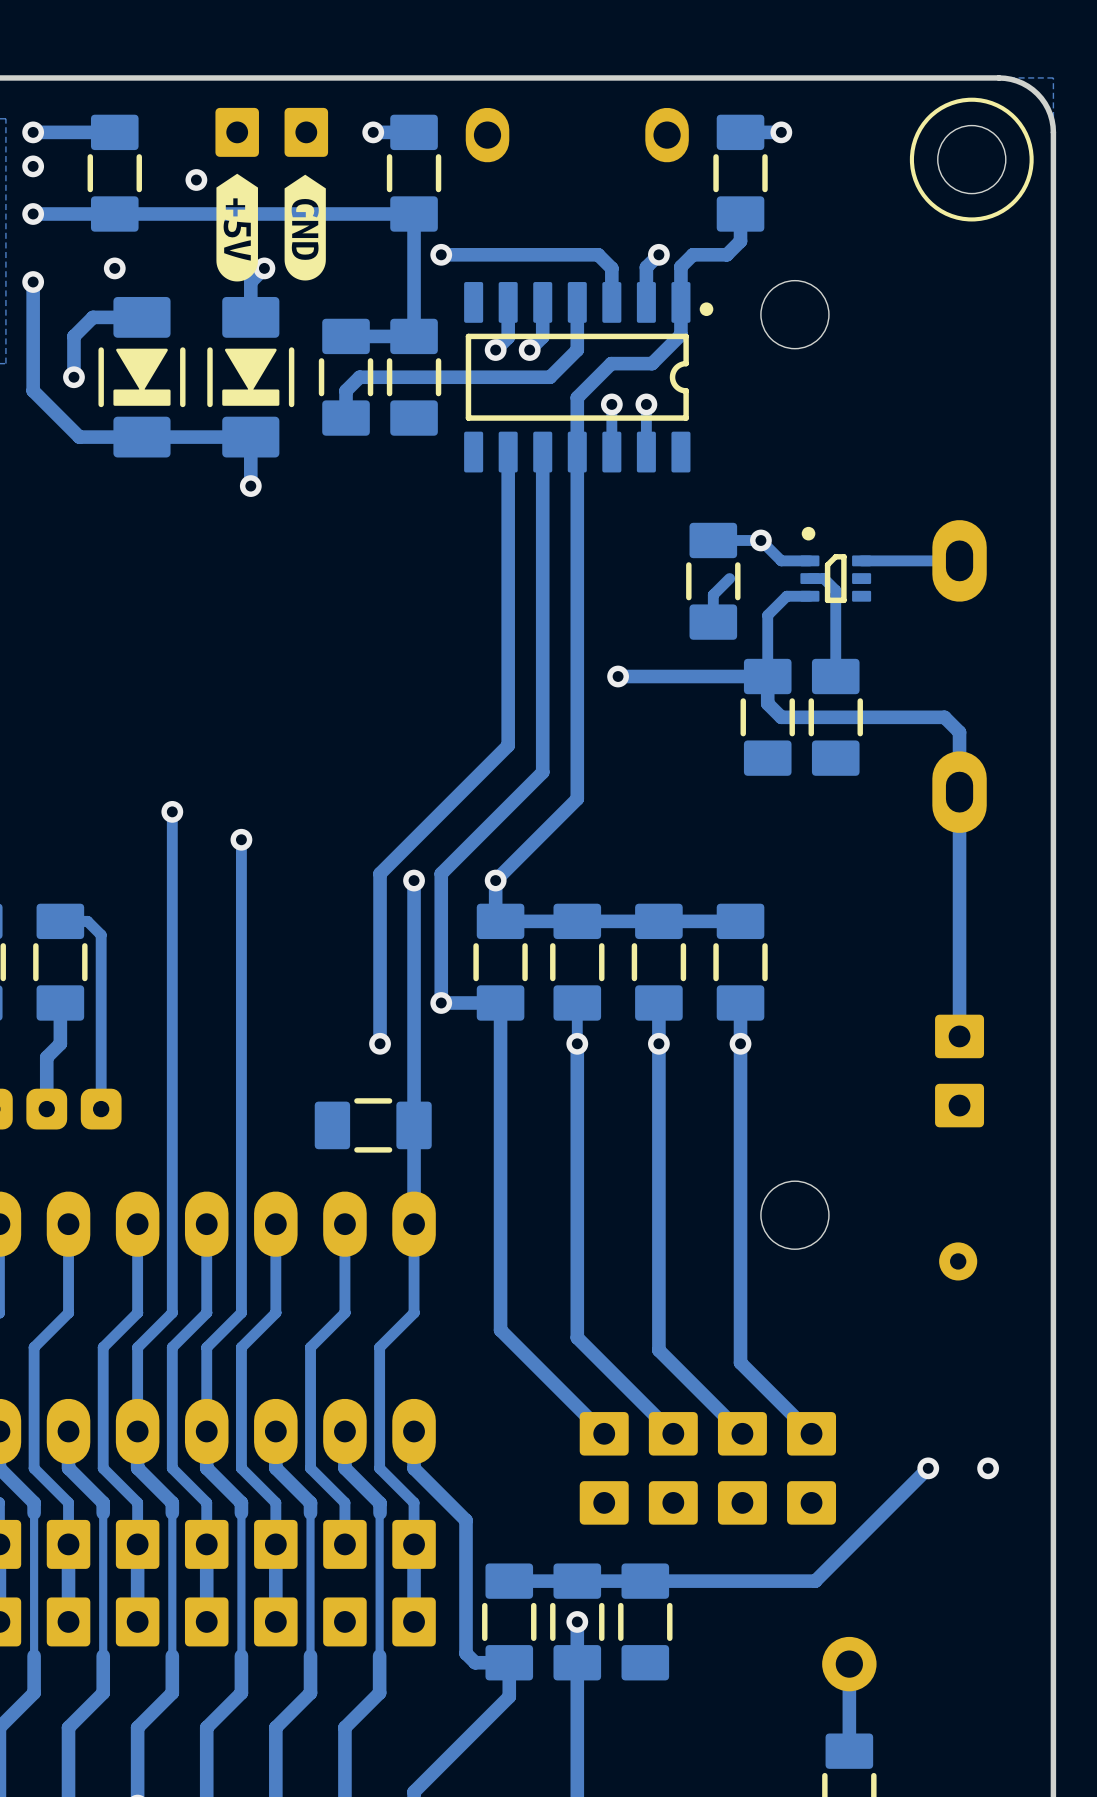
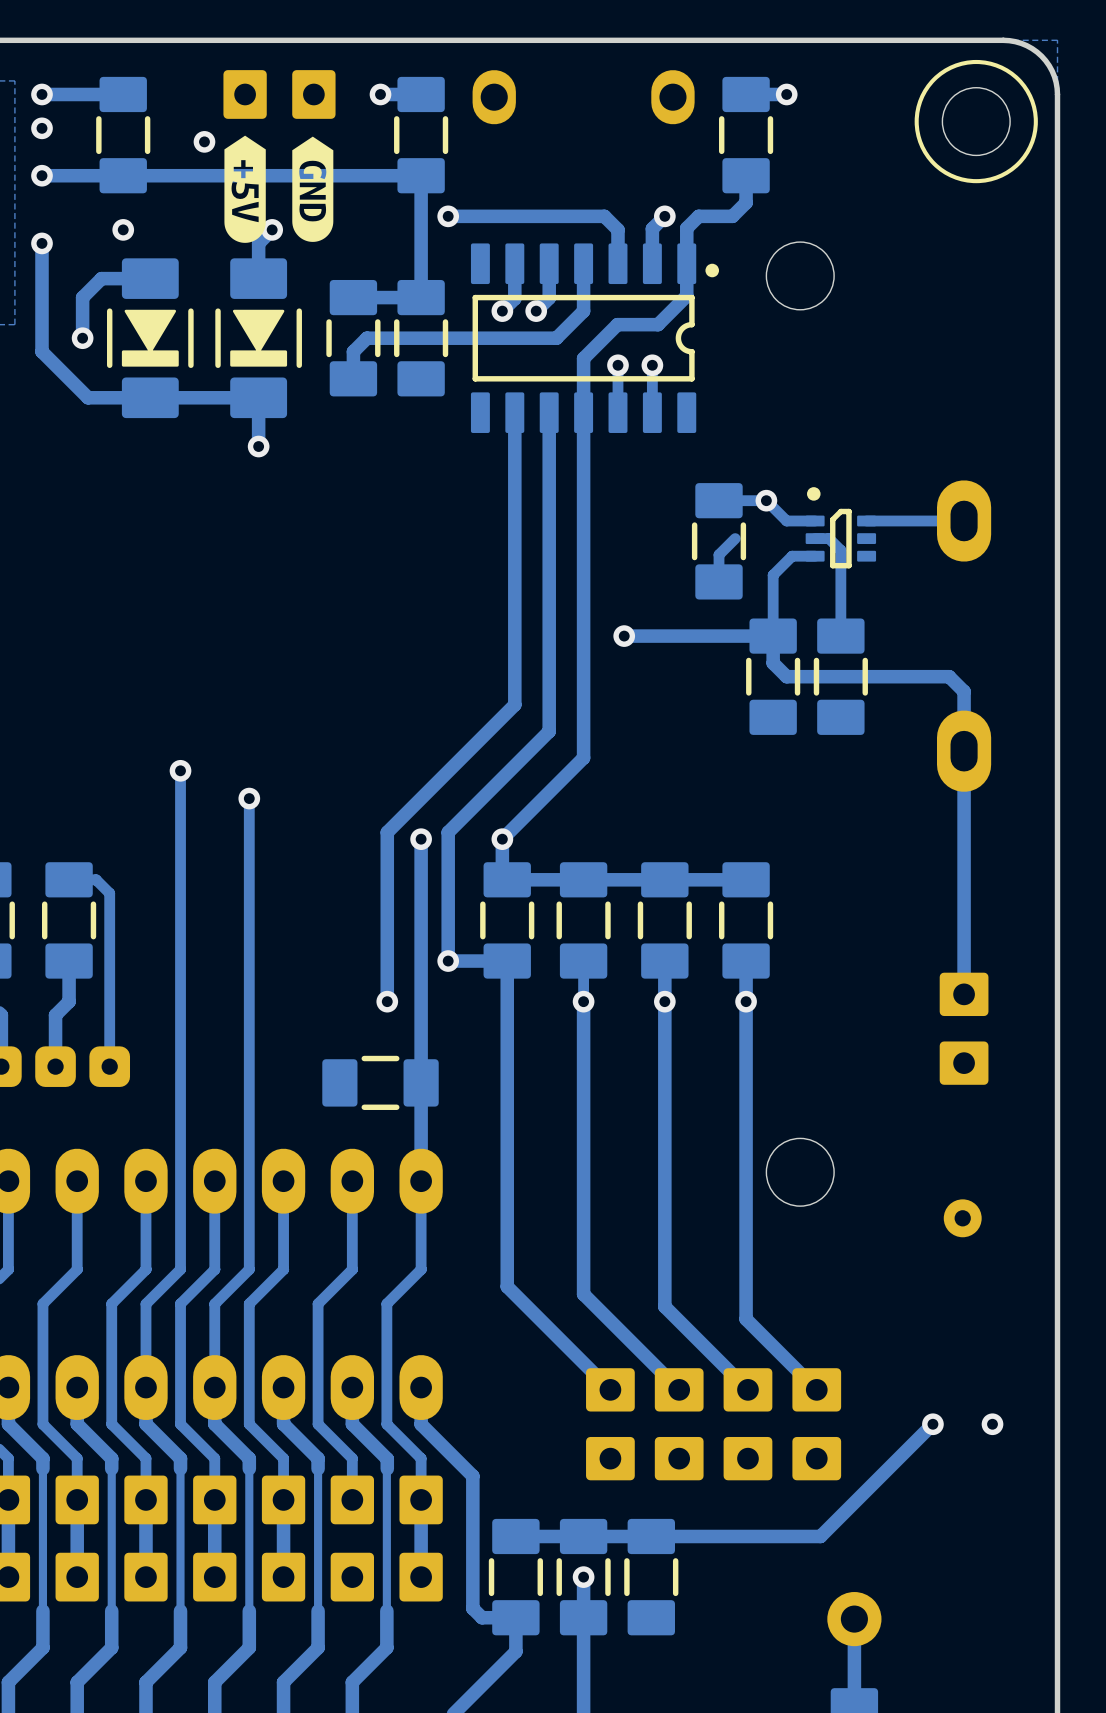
part footprint: [800, 554, 872, 604] -> [805, 508, 877, 569]

